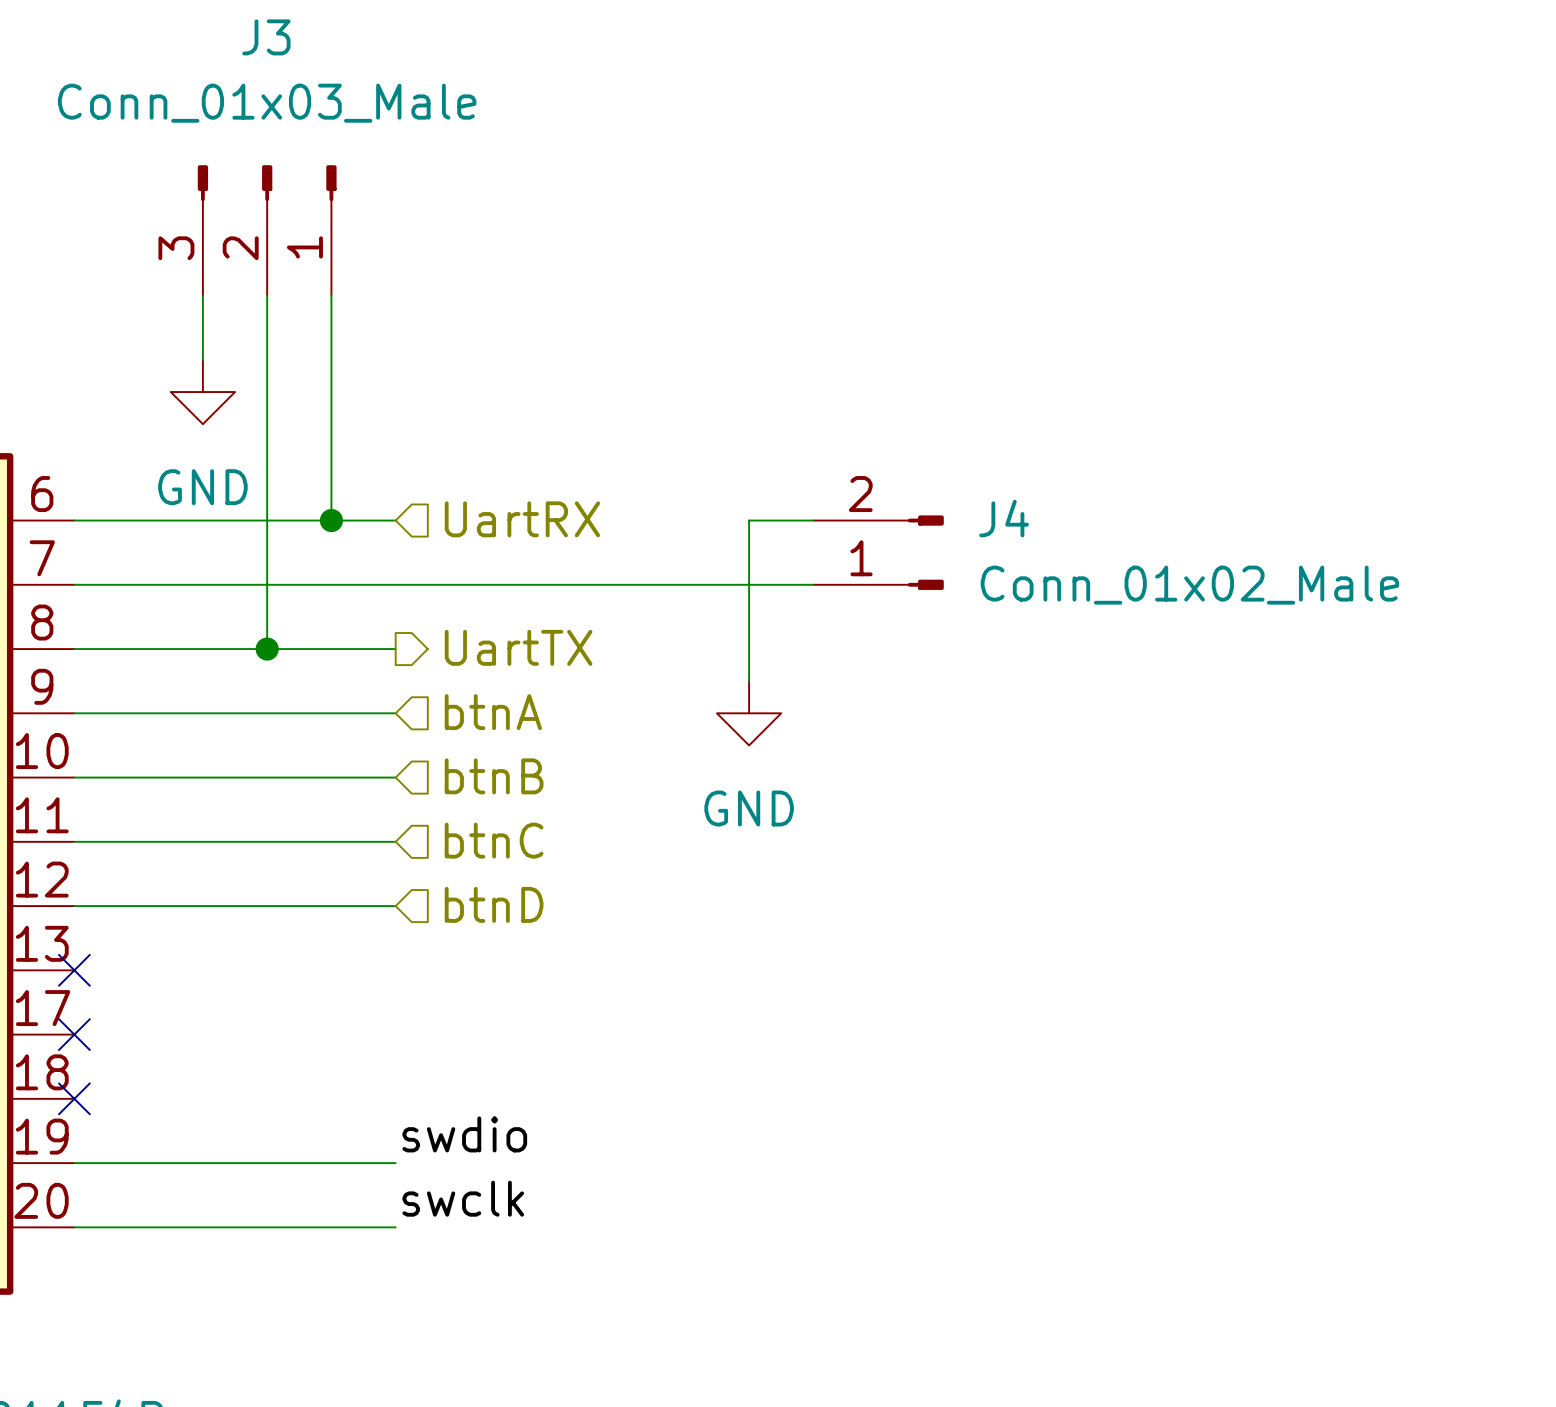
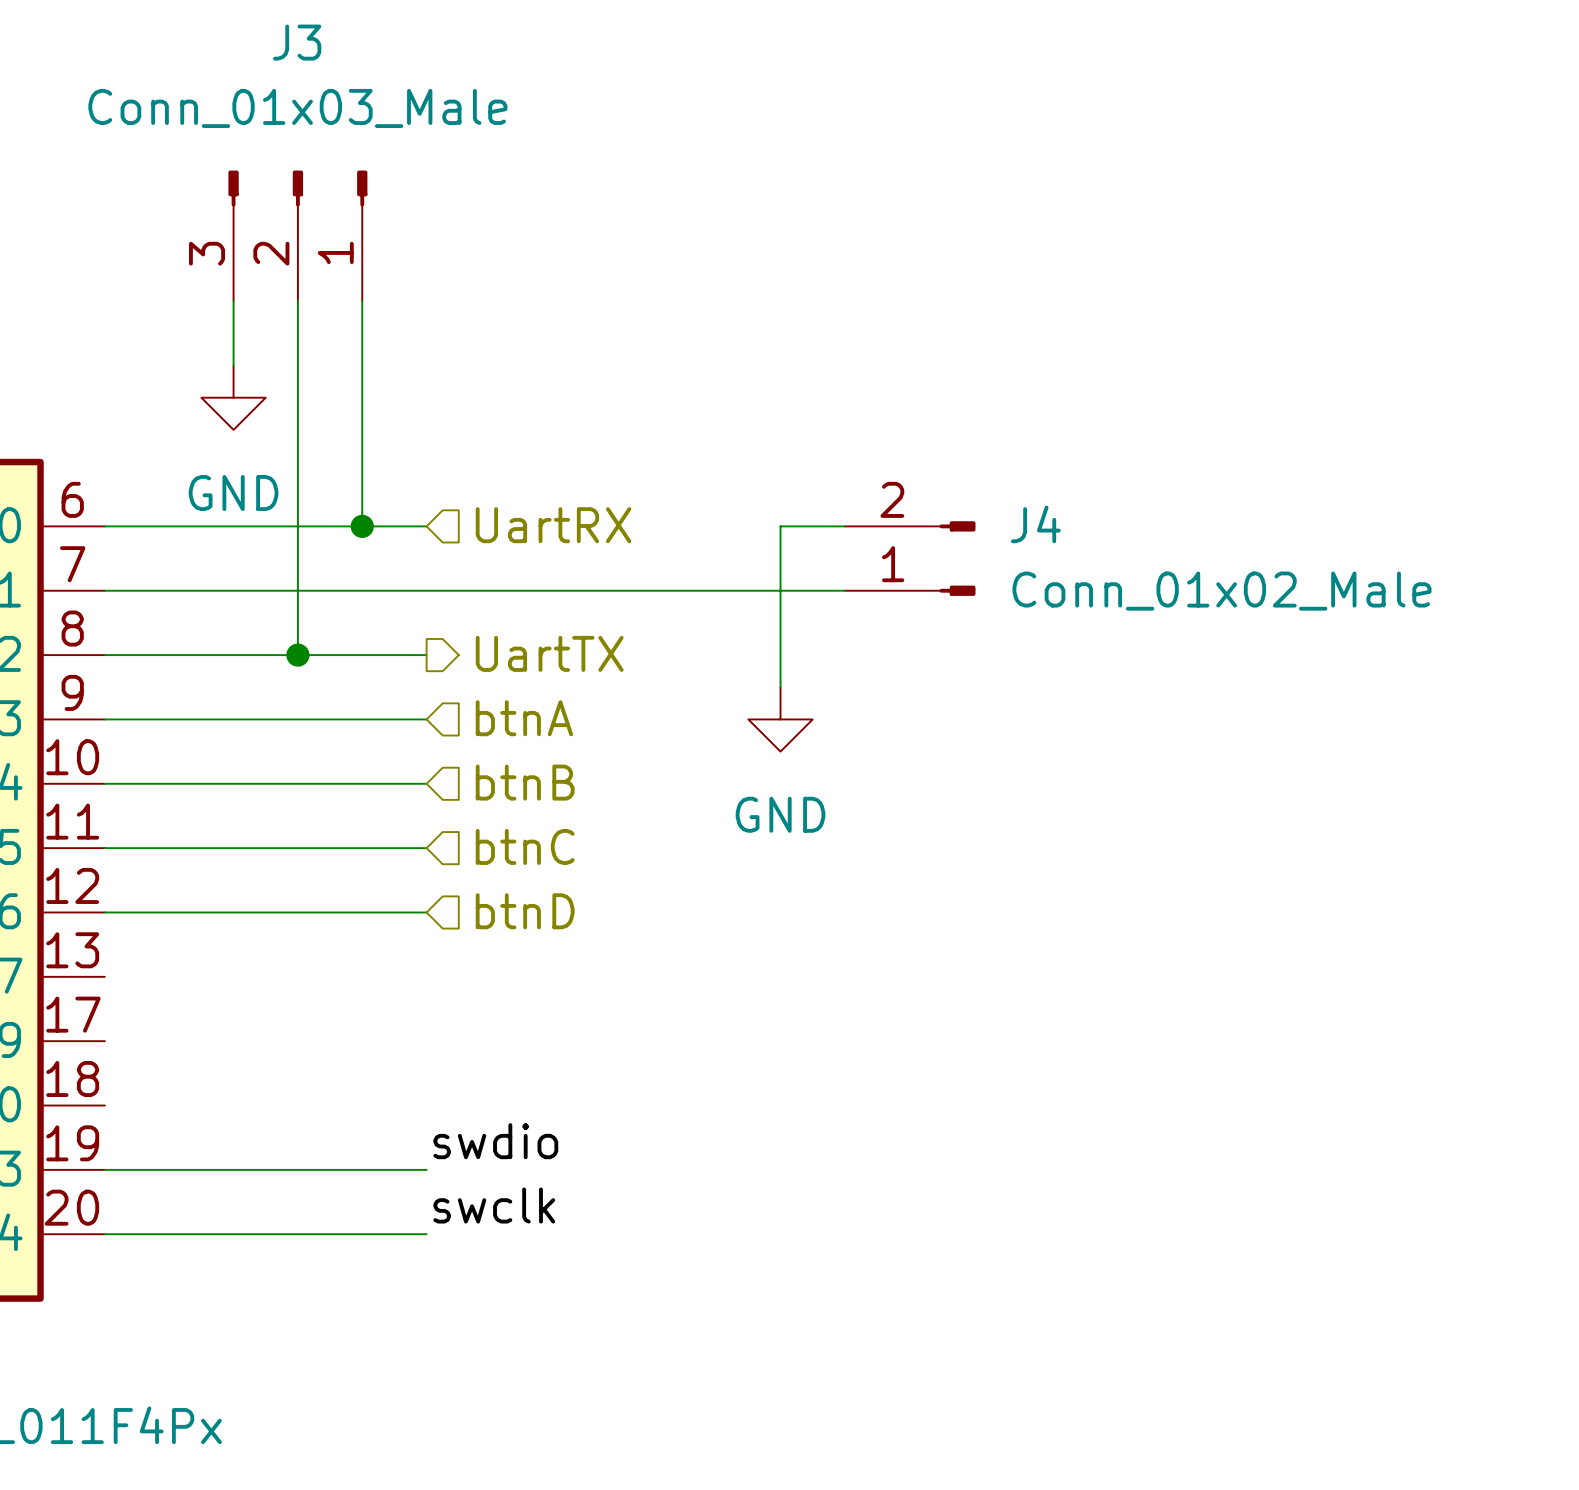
no-connect mark: (74, 970) -> none
no-connect mark: (74, 1034) -> none
no-connect mark: (74, 1098) -> none

